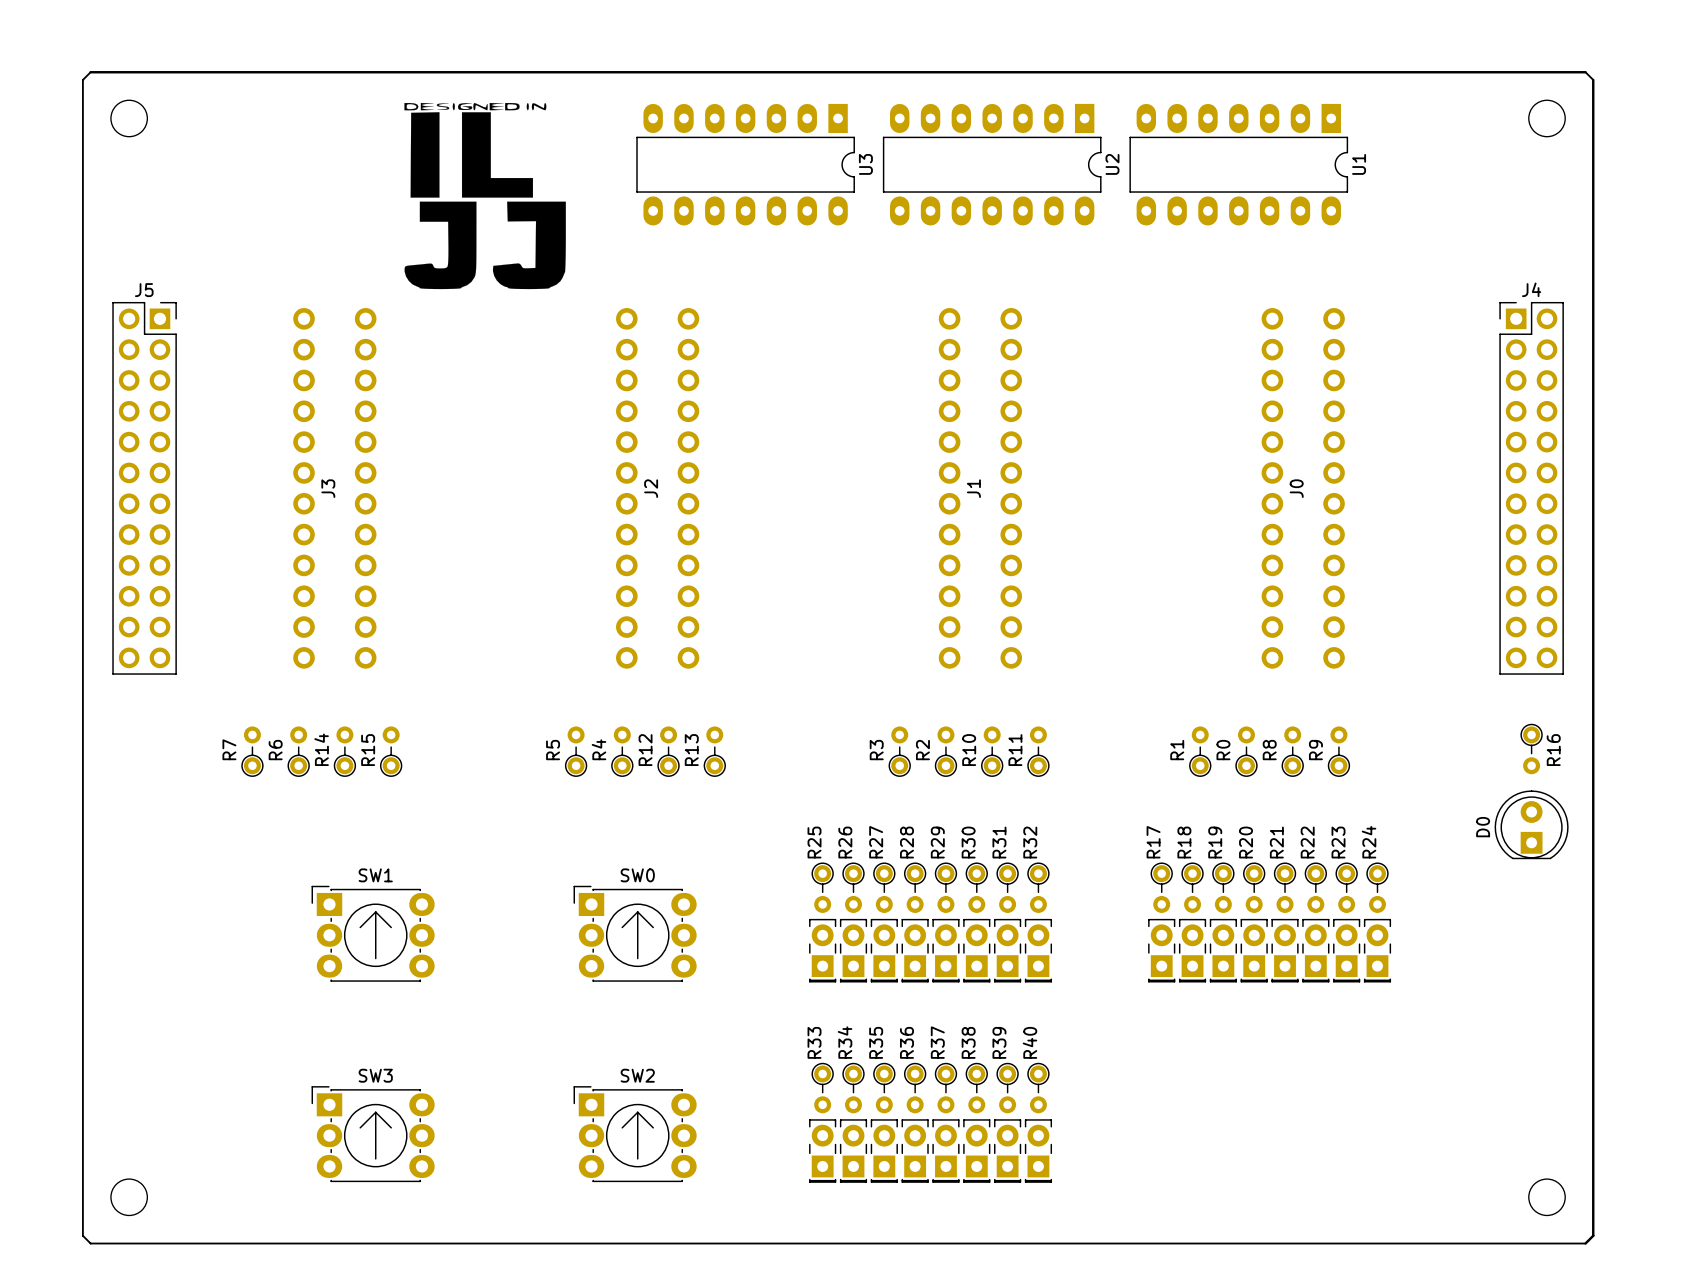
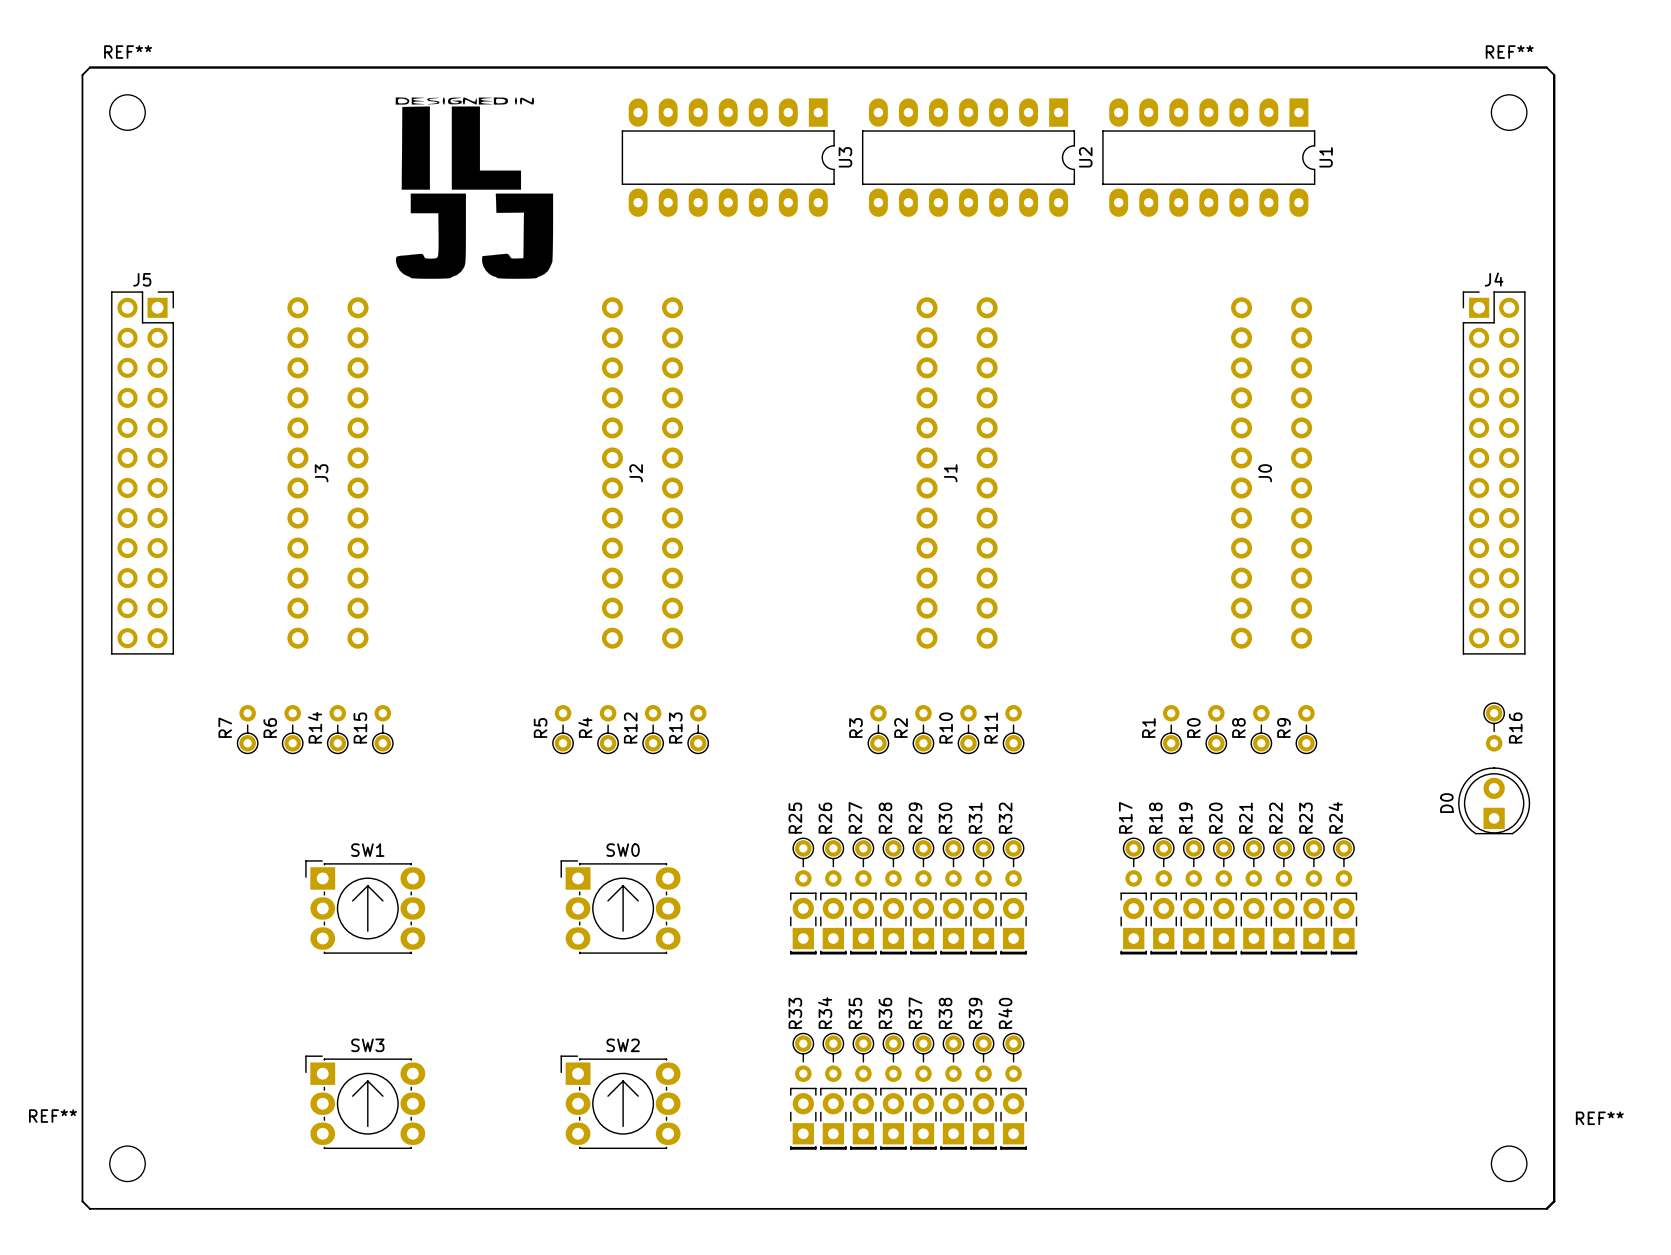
REF** name: none -> REF** (128, 52)
REF** name: none -> REF** (1509, 52)
REF** name: none -> REF** (52, 1116)
REF** name: none -> REF** (1599, 1118)

